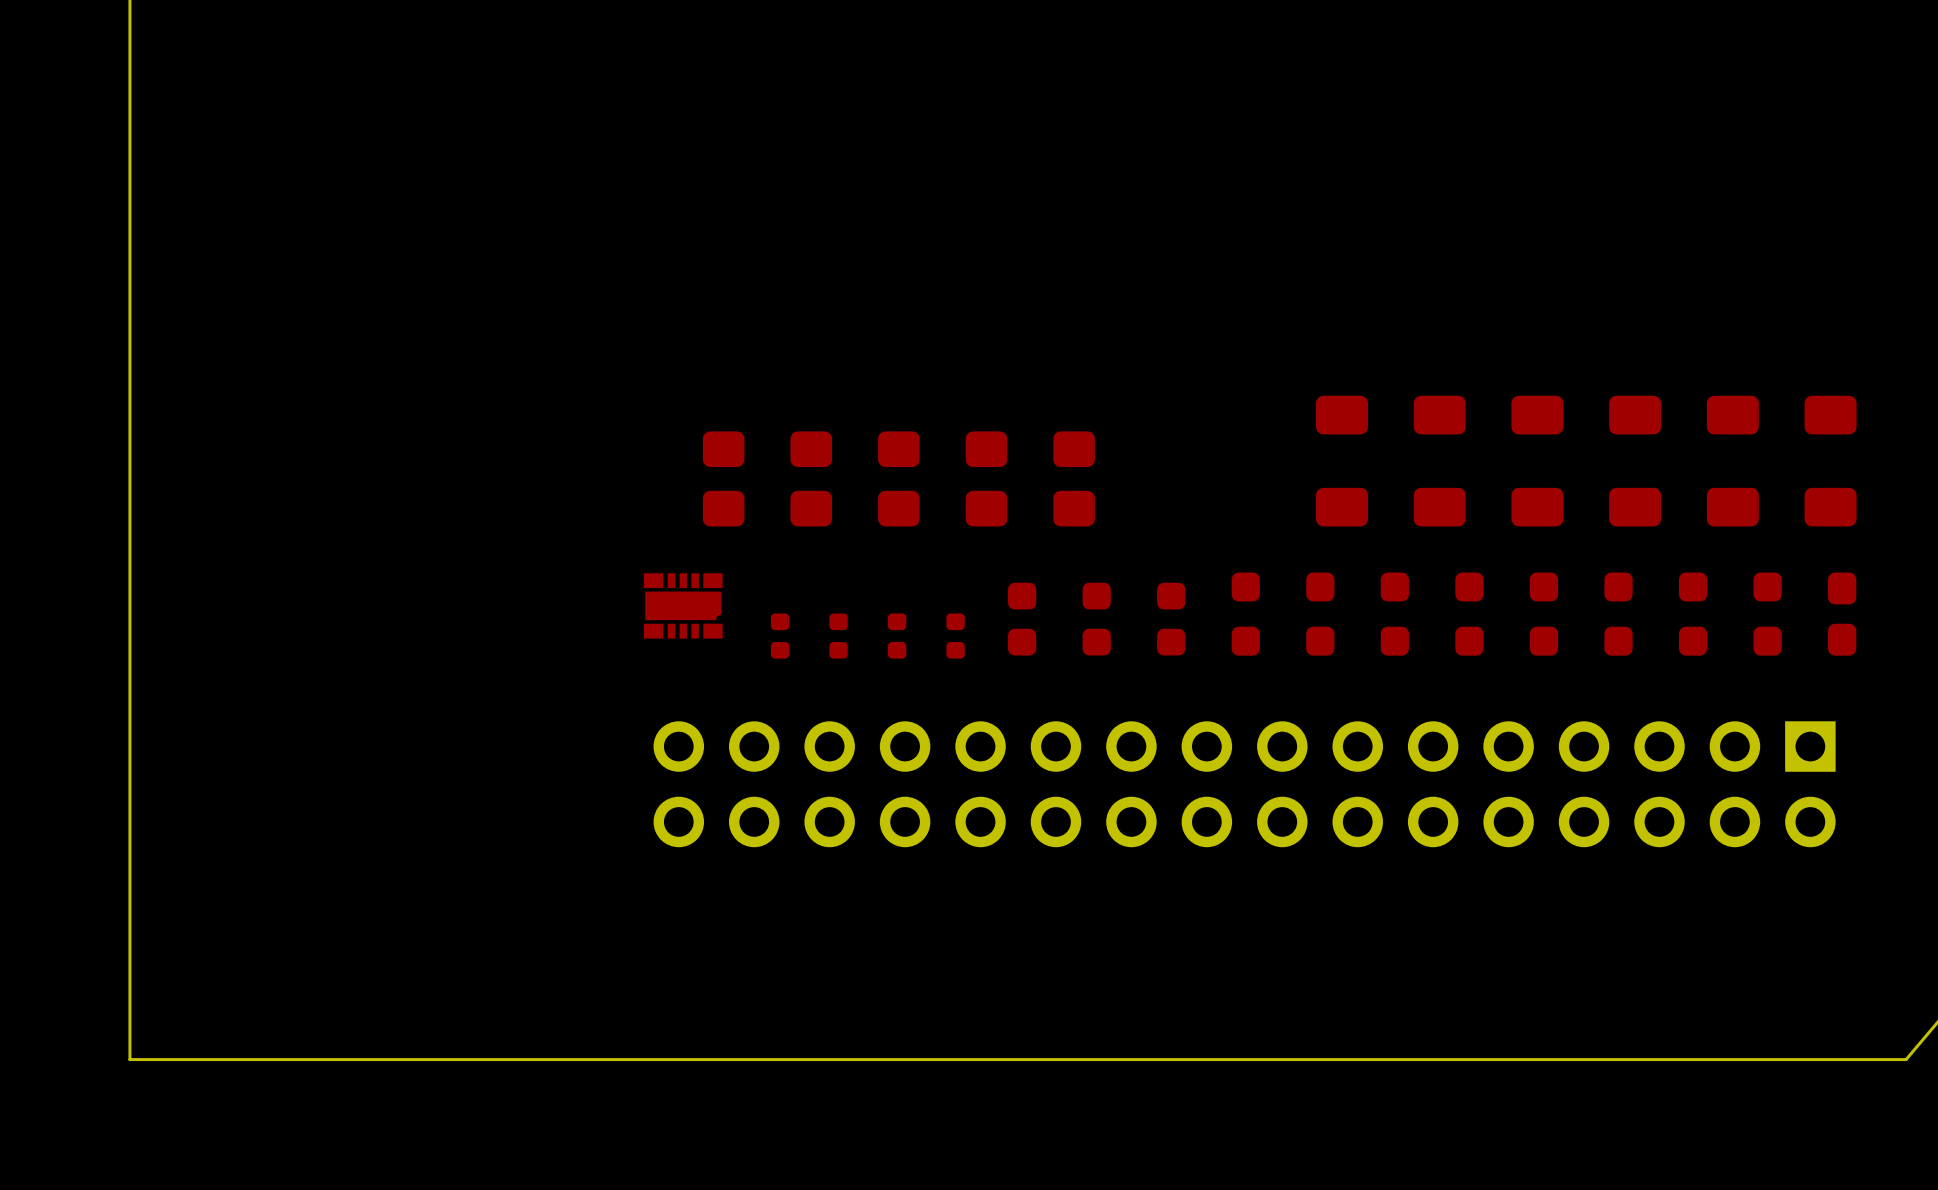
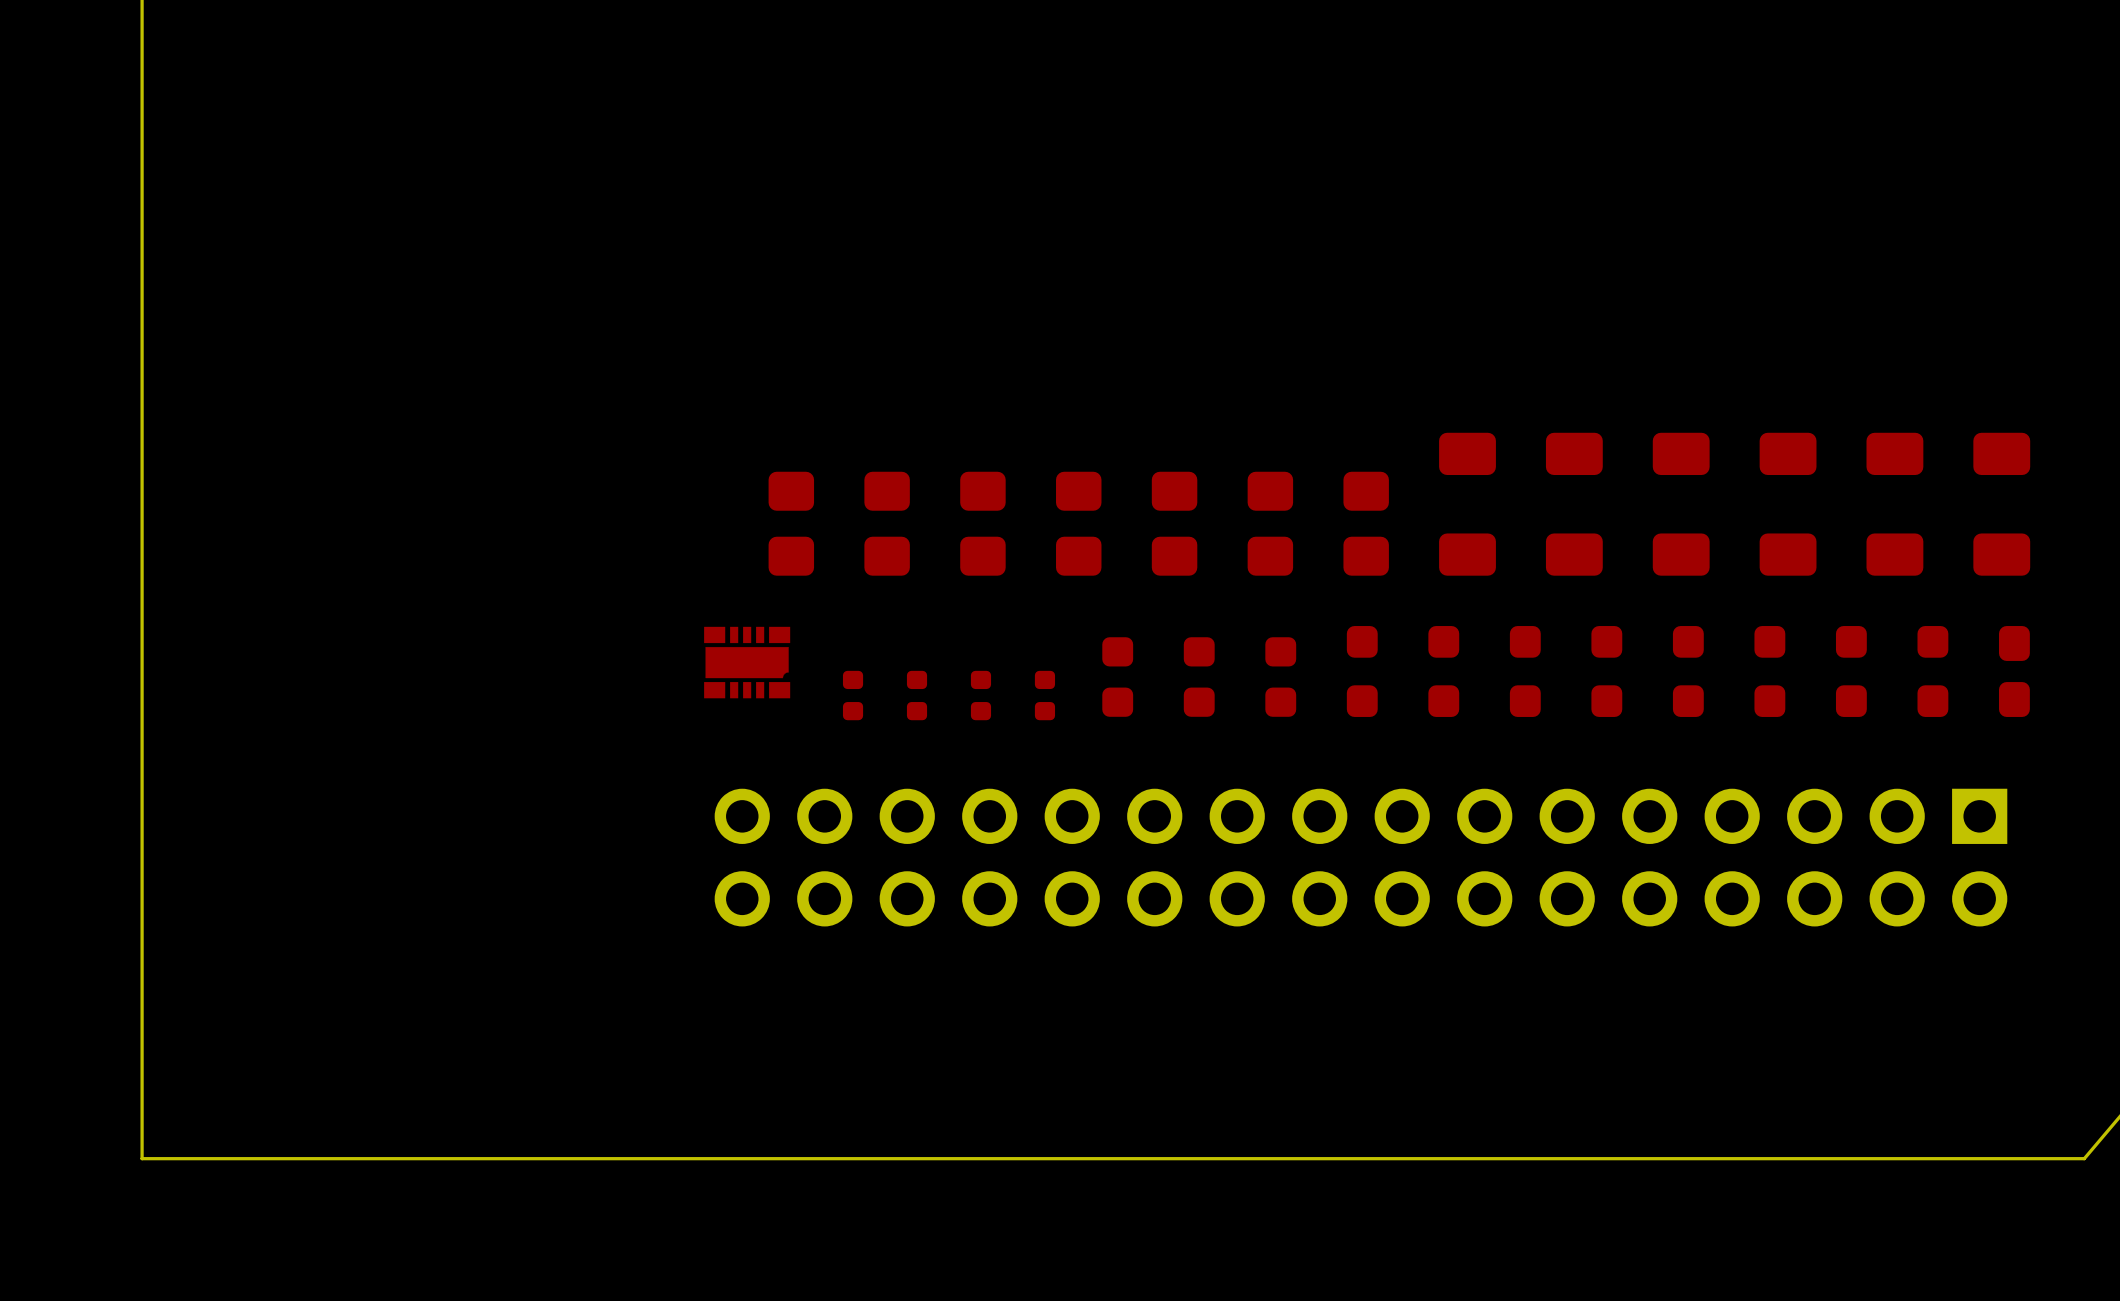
part: none -> (1270, 523)
part: none -> (1366, 523)

